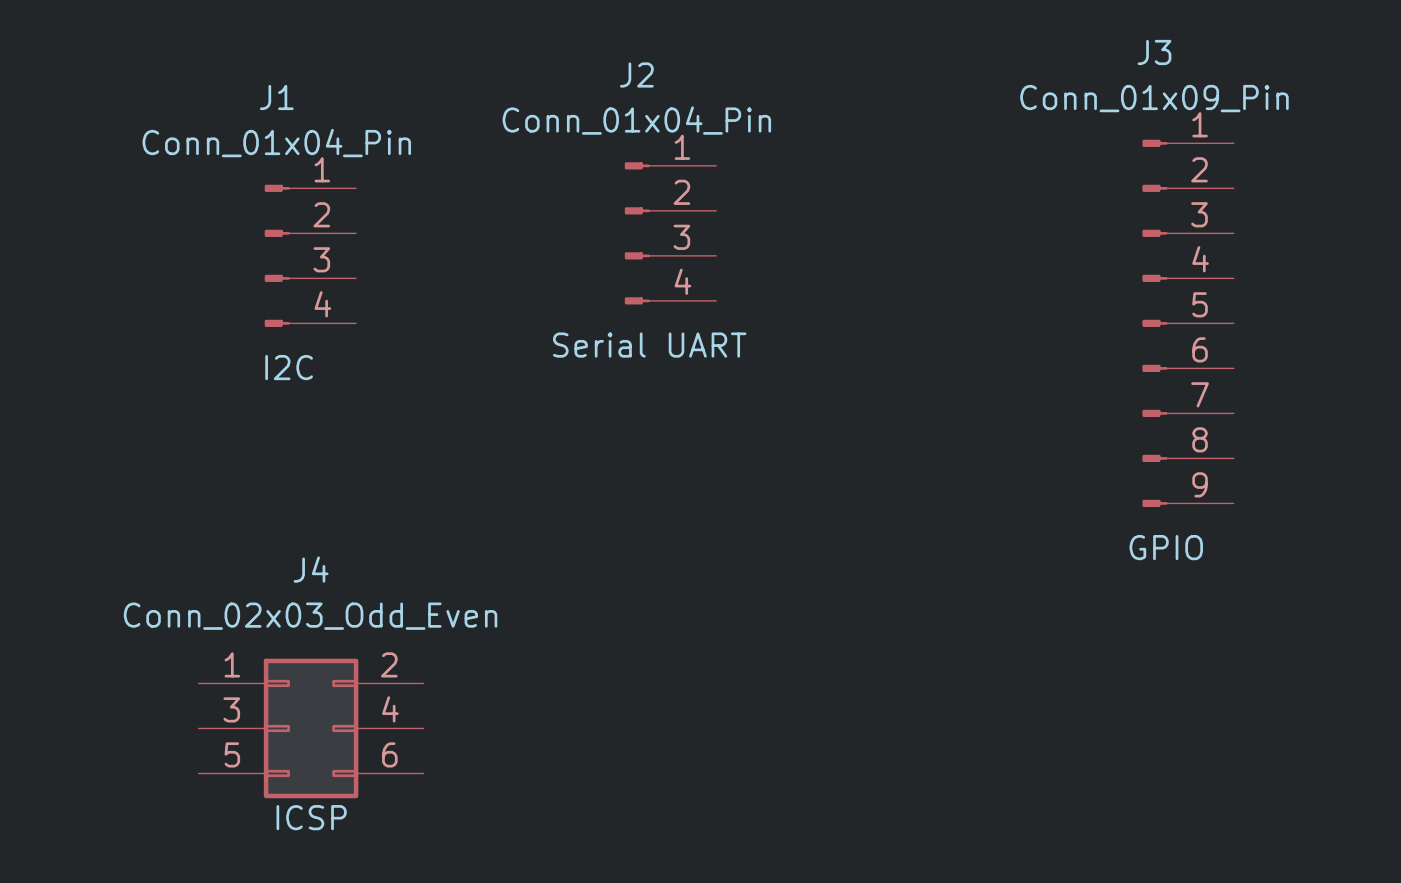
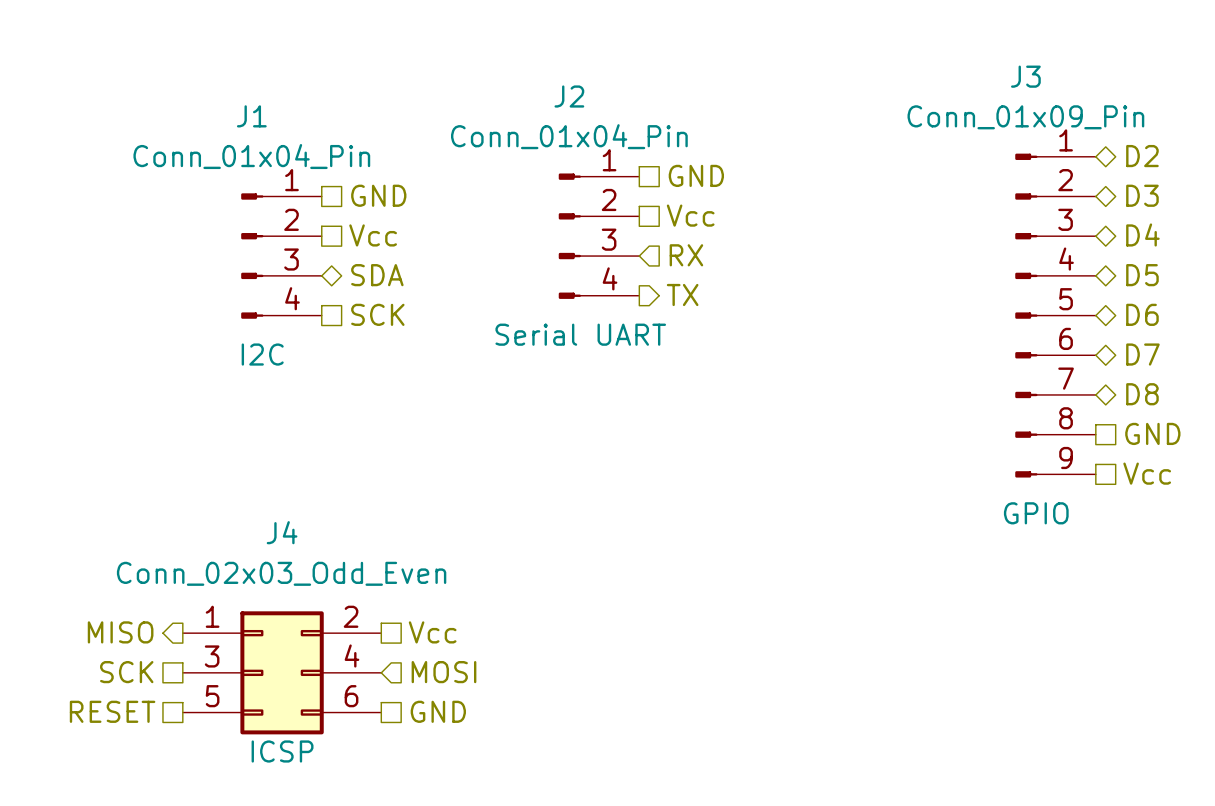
hierarchical label: none -> D2 (1142, 156)
hierarchical label: none -> GND (696, 175)
hierarchical label: none -> GND (378, 195)
hierarchical label: none -> D3 (1142, 195)
hierarchical label: none -> Vcc (690, 215)
hierarchical label: none -> D4 (1142, 234)
hierarchical label: none -> Vcc (373, 235)
hierarchical label: none -> RX (686, 255)
hierarchical label: none -> SDA (377, 275)
hierarchical label: none -> D5 (1142, 275)
hierarchical label: none -> TX (682, 294)
hierarchical label: none -> SCK (377, 314)
hierarchical label: none -> D6 (1142, 314)
hierarchical label: none -> D7 (1142, 354)
hierarchical label: none -> D8 (1142, 394)
hierarchical label: none -> GND (1152, 433)
hierarchical label: none -> Vcc (1147, 473)
hierarchical label: none -> MISO (120, 632)
hierarchical label: none -> Vcc (432, 632)
hierarchical label: none -> SCK (126, 672)
hierarchical label: none -> MOSI (443, 672)
hierarchical label: none -> RESET (112, 711)
hierarchical label: none -> GND (438, 711)

